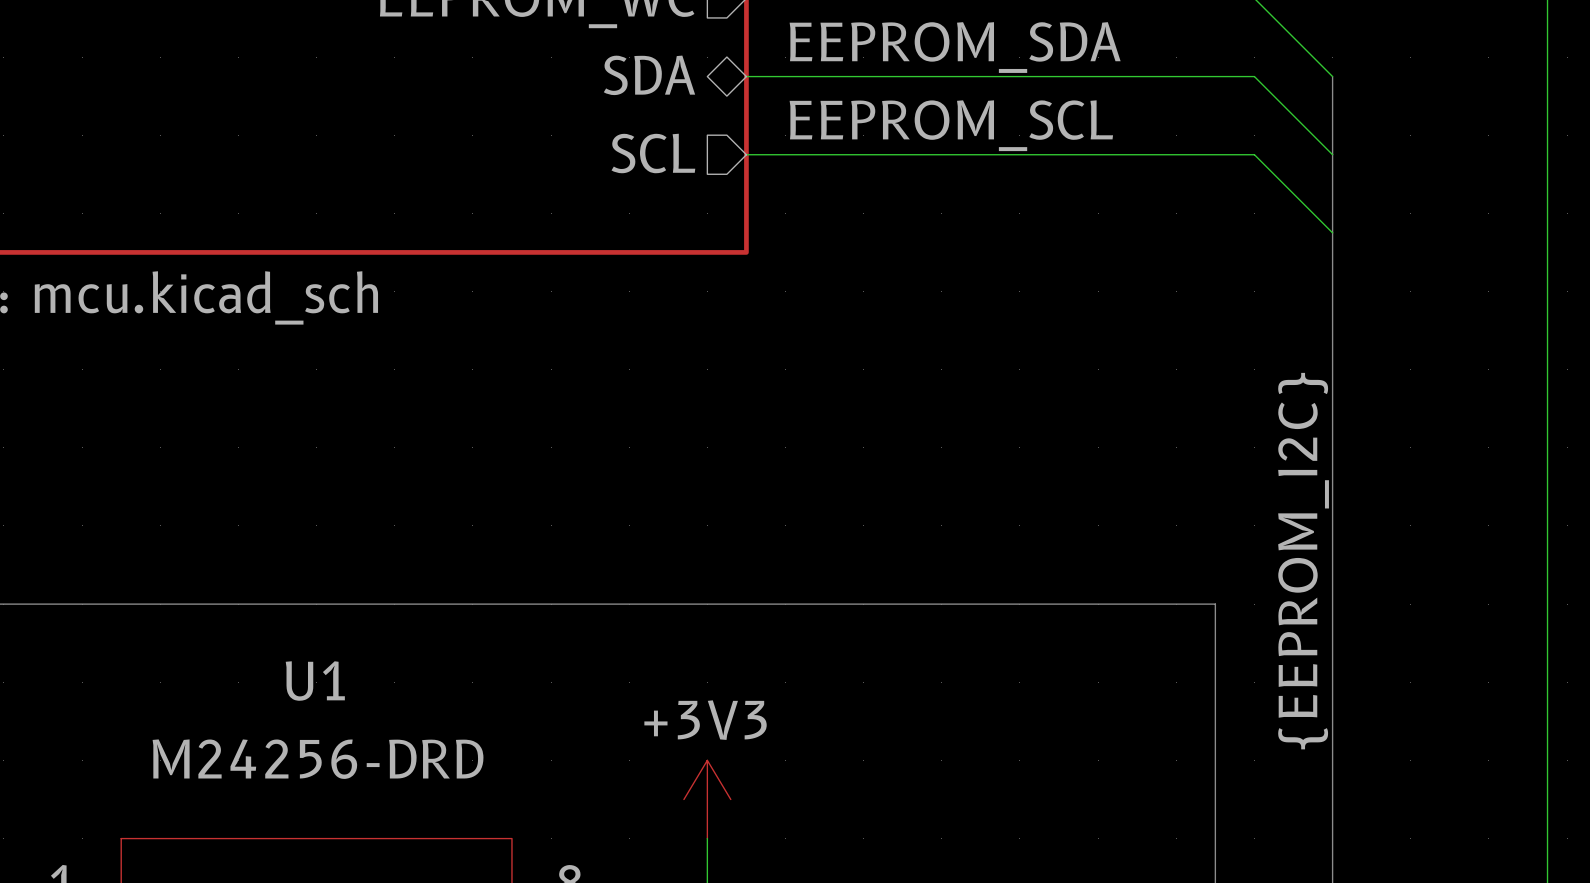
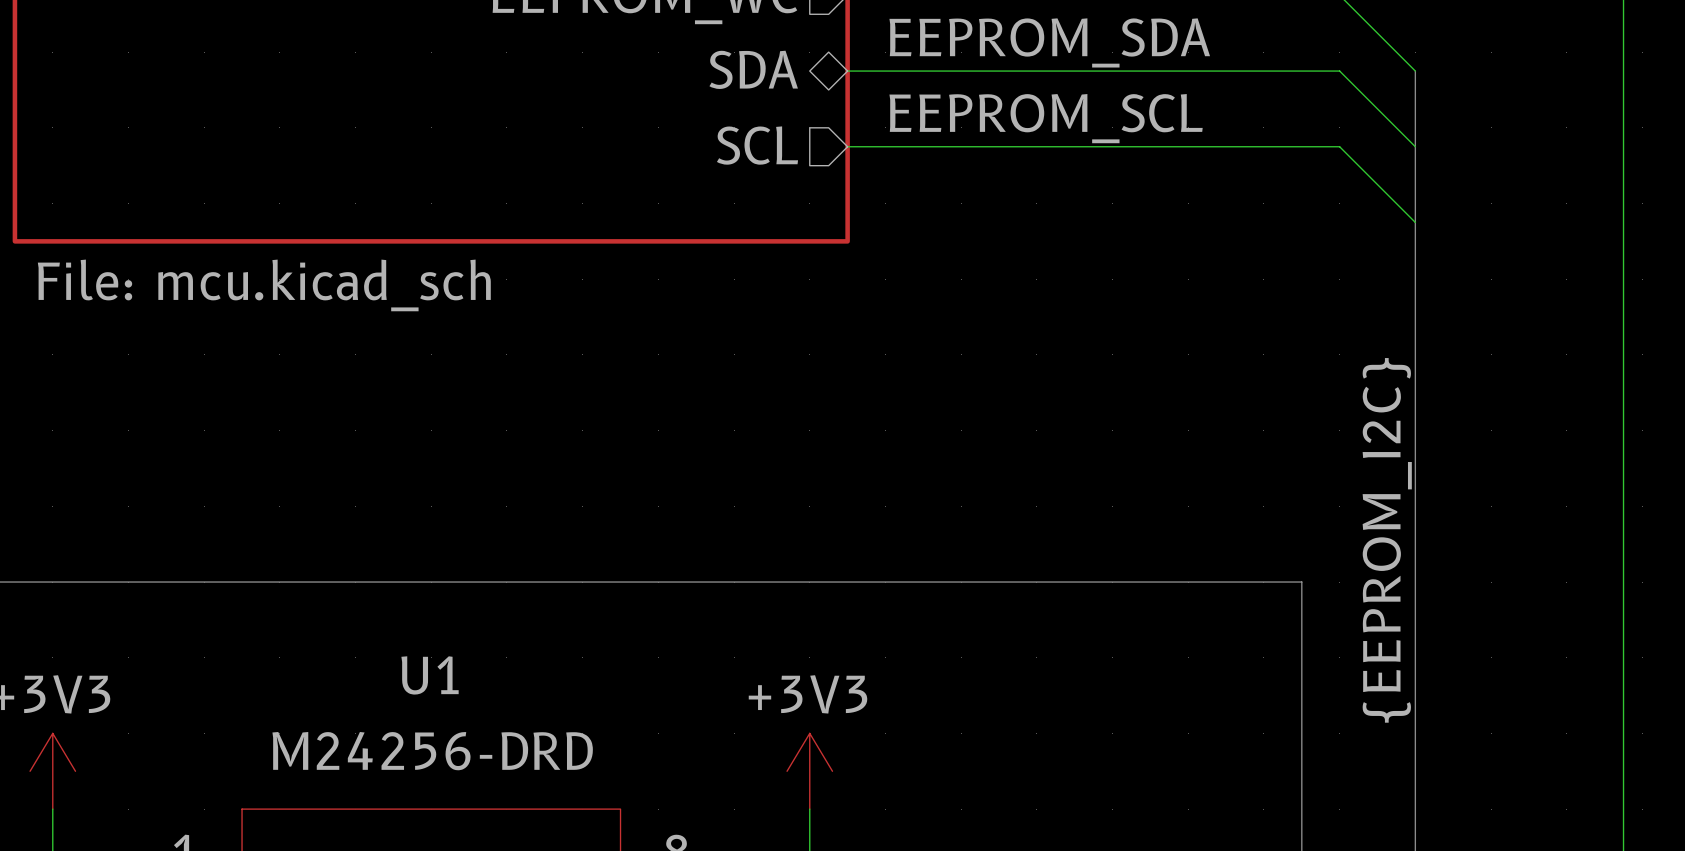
U1 name position: U1 (315, 681) -> U1 (430, 675)
U1 value position: M24256-DRD (318, 759) -> M24256-DRD (432, 751)

